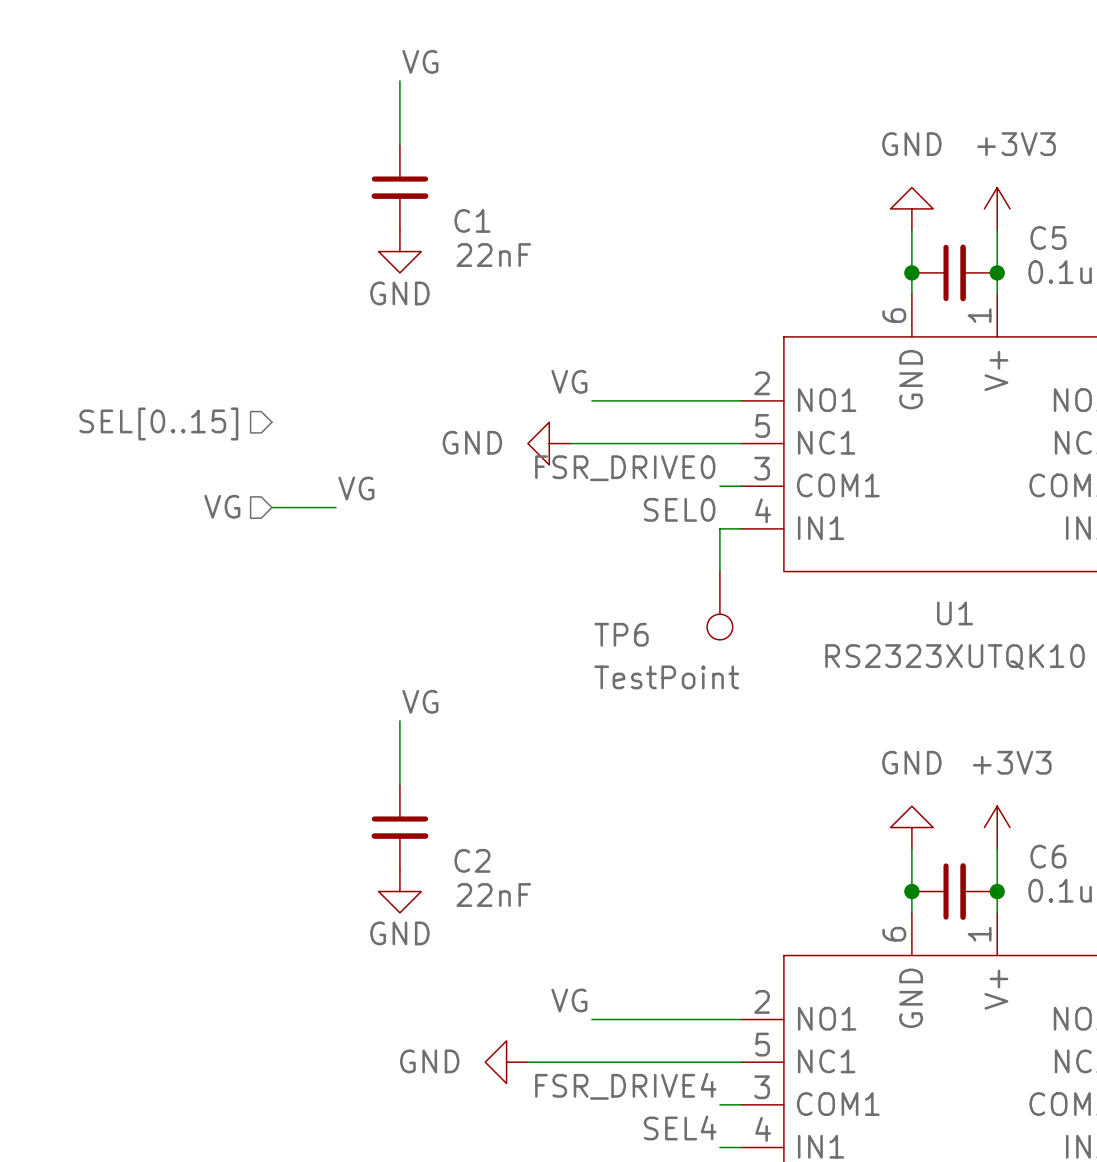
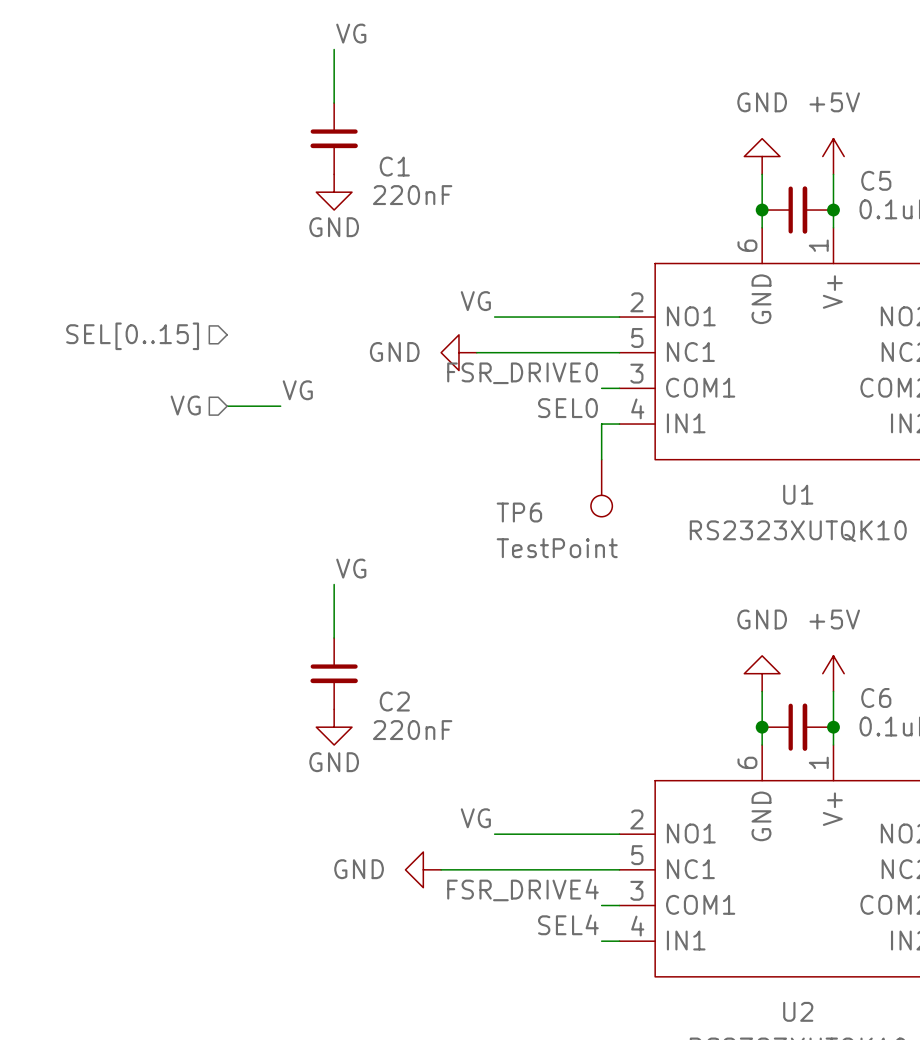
power symbol: +3V3 (997, 208) -> +5V (833, 156)
C1 value: 22nF (493, 255) -> 220nF (412, 195)
power symbol: +3V3 (997, 827) -> +5V (833, 673)
C2 value: 22nF (493, 895) -> 220nF (412, 730)

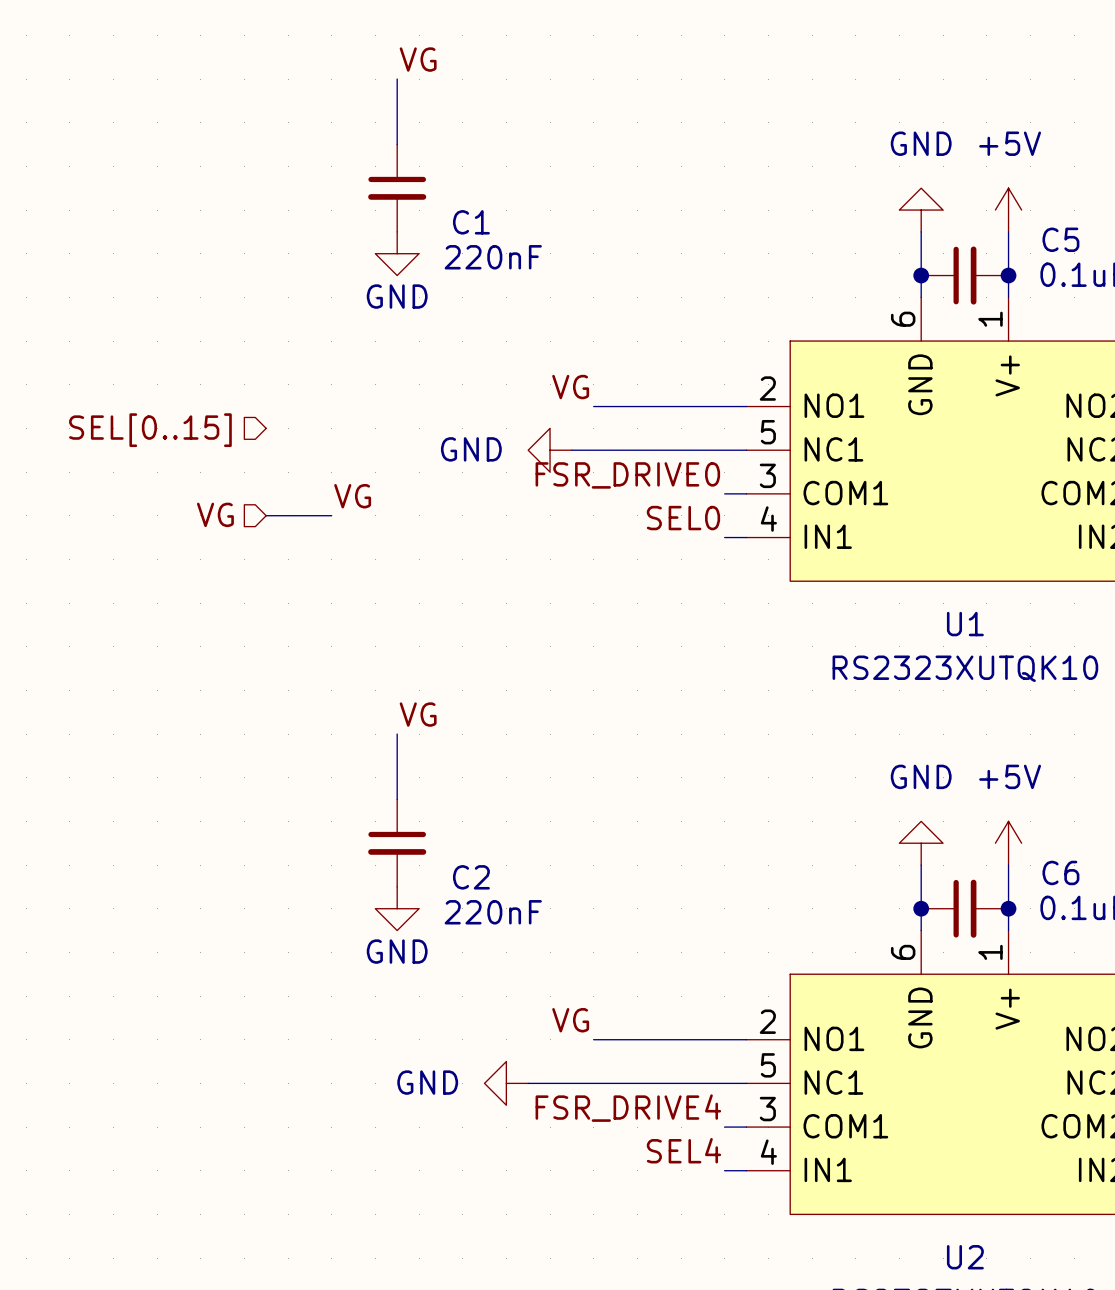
wire: (601, 424) (601, 459) -> none
TP6: TestPoint (601, 488) -> none

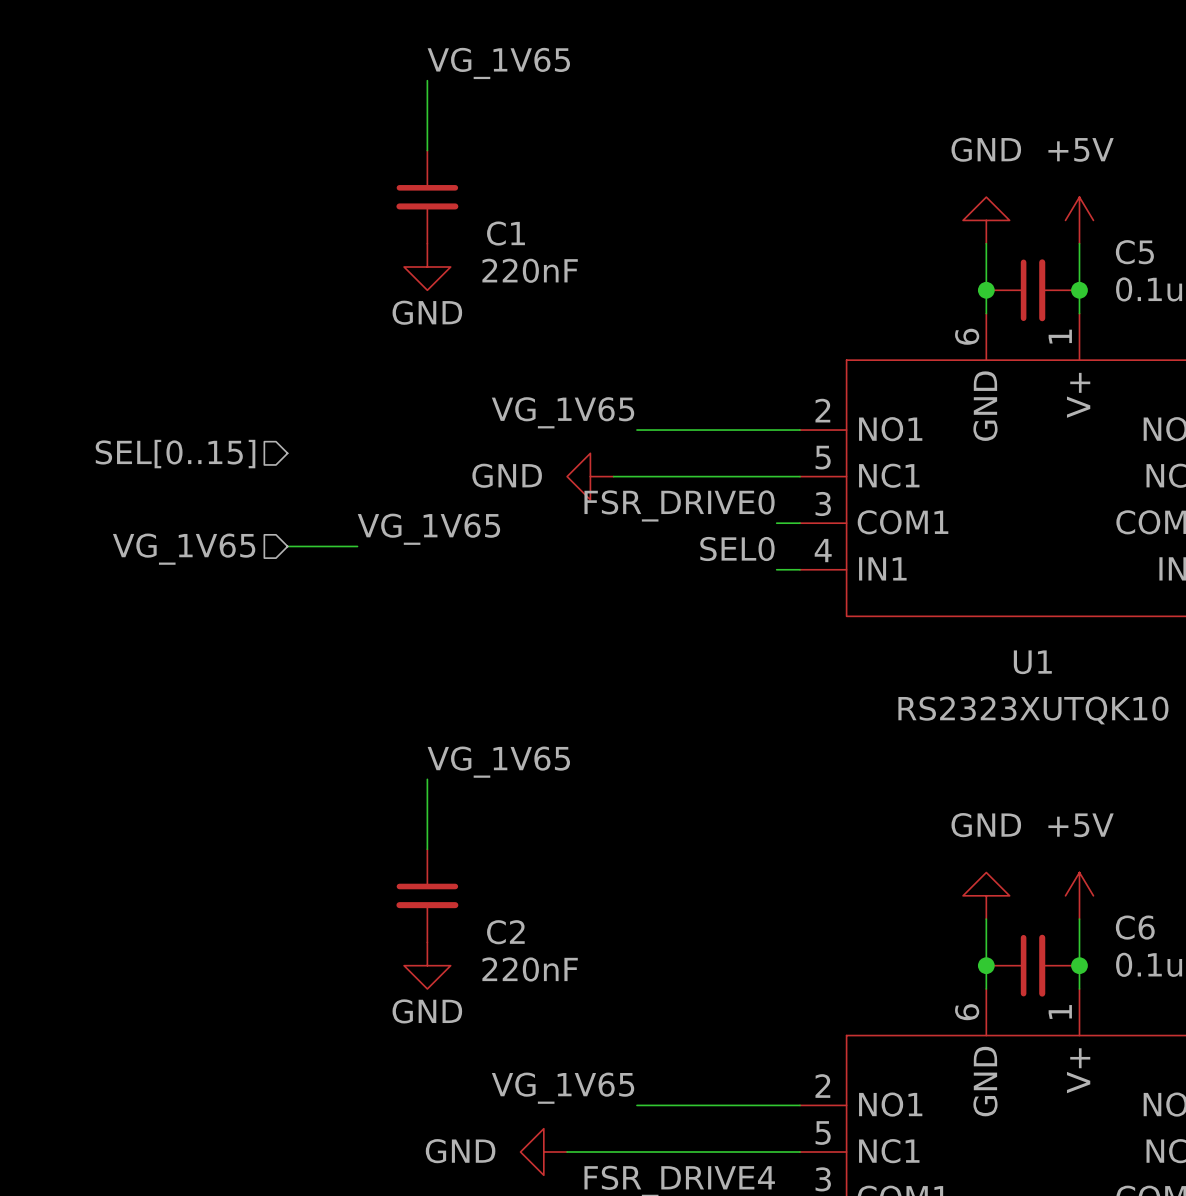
label: VG (418, 59) -> VG_1V65 (498, 63)
label: VG (570, 387) -> VG_1V65 (563, 412)
label: VG (352, 496) -> VG_1V65 (428, 529)
hierarchical label: VG (215, 514) -> VG_1V65 (184, 549)
label: VG (418, 714) -> VG_1V65 (498, 762)
label: VG (570, 1020) -> VG_1V65 (563, 1088)

